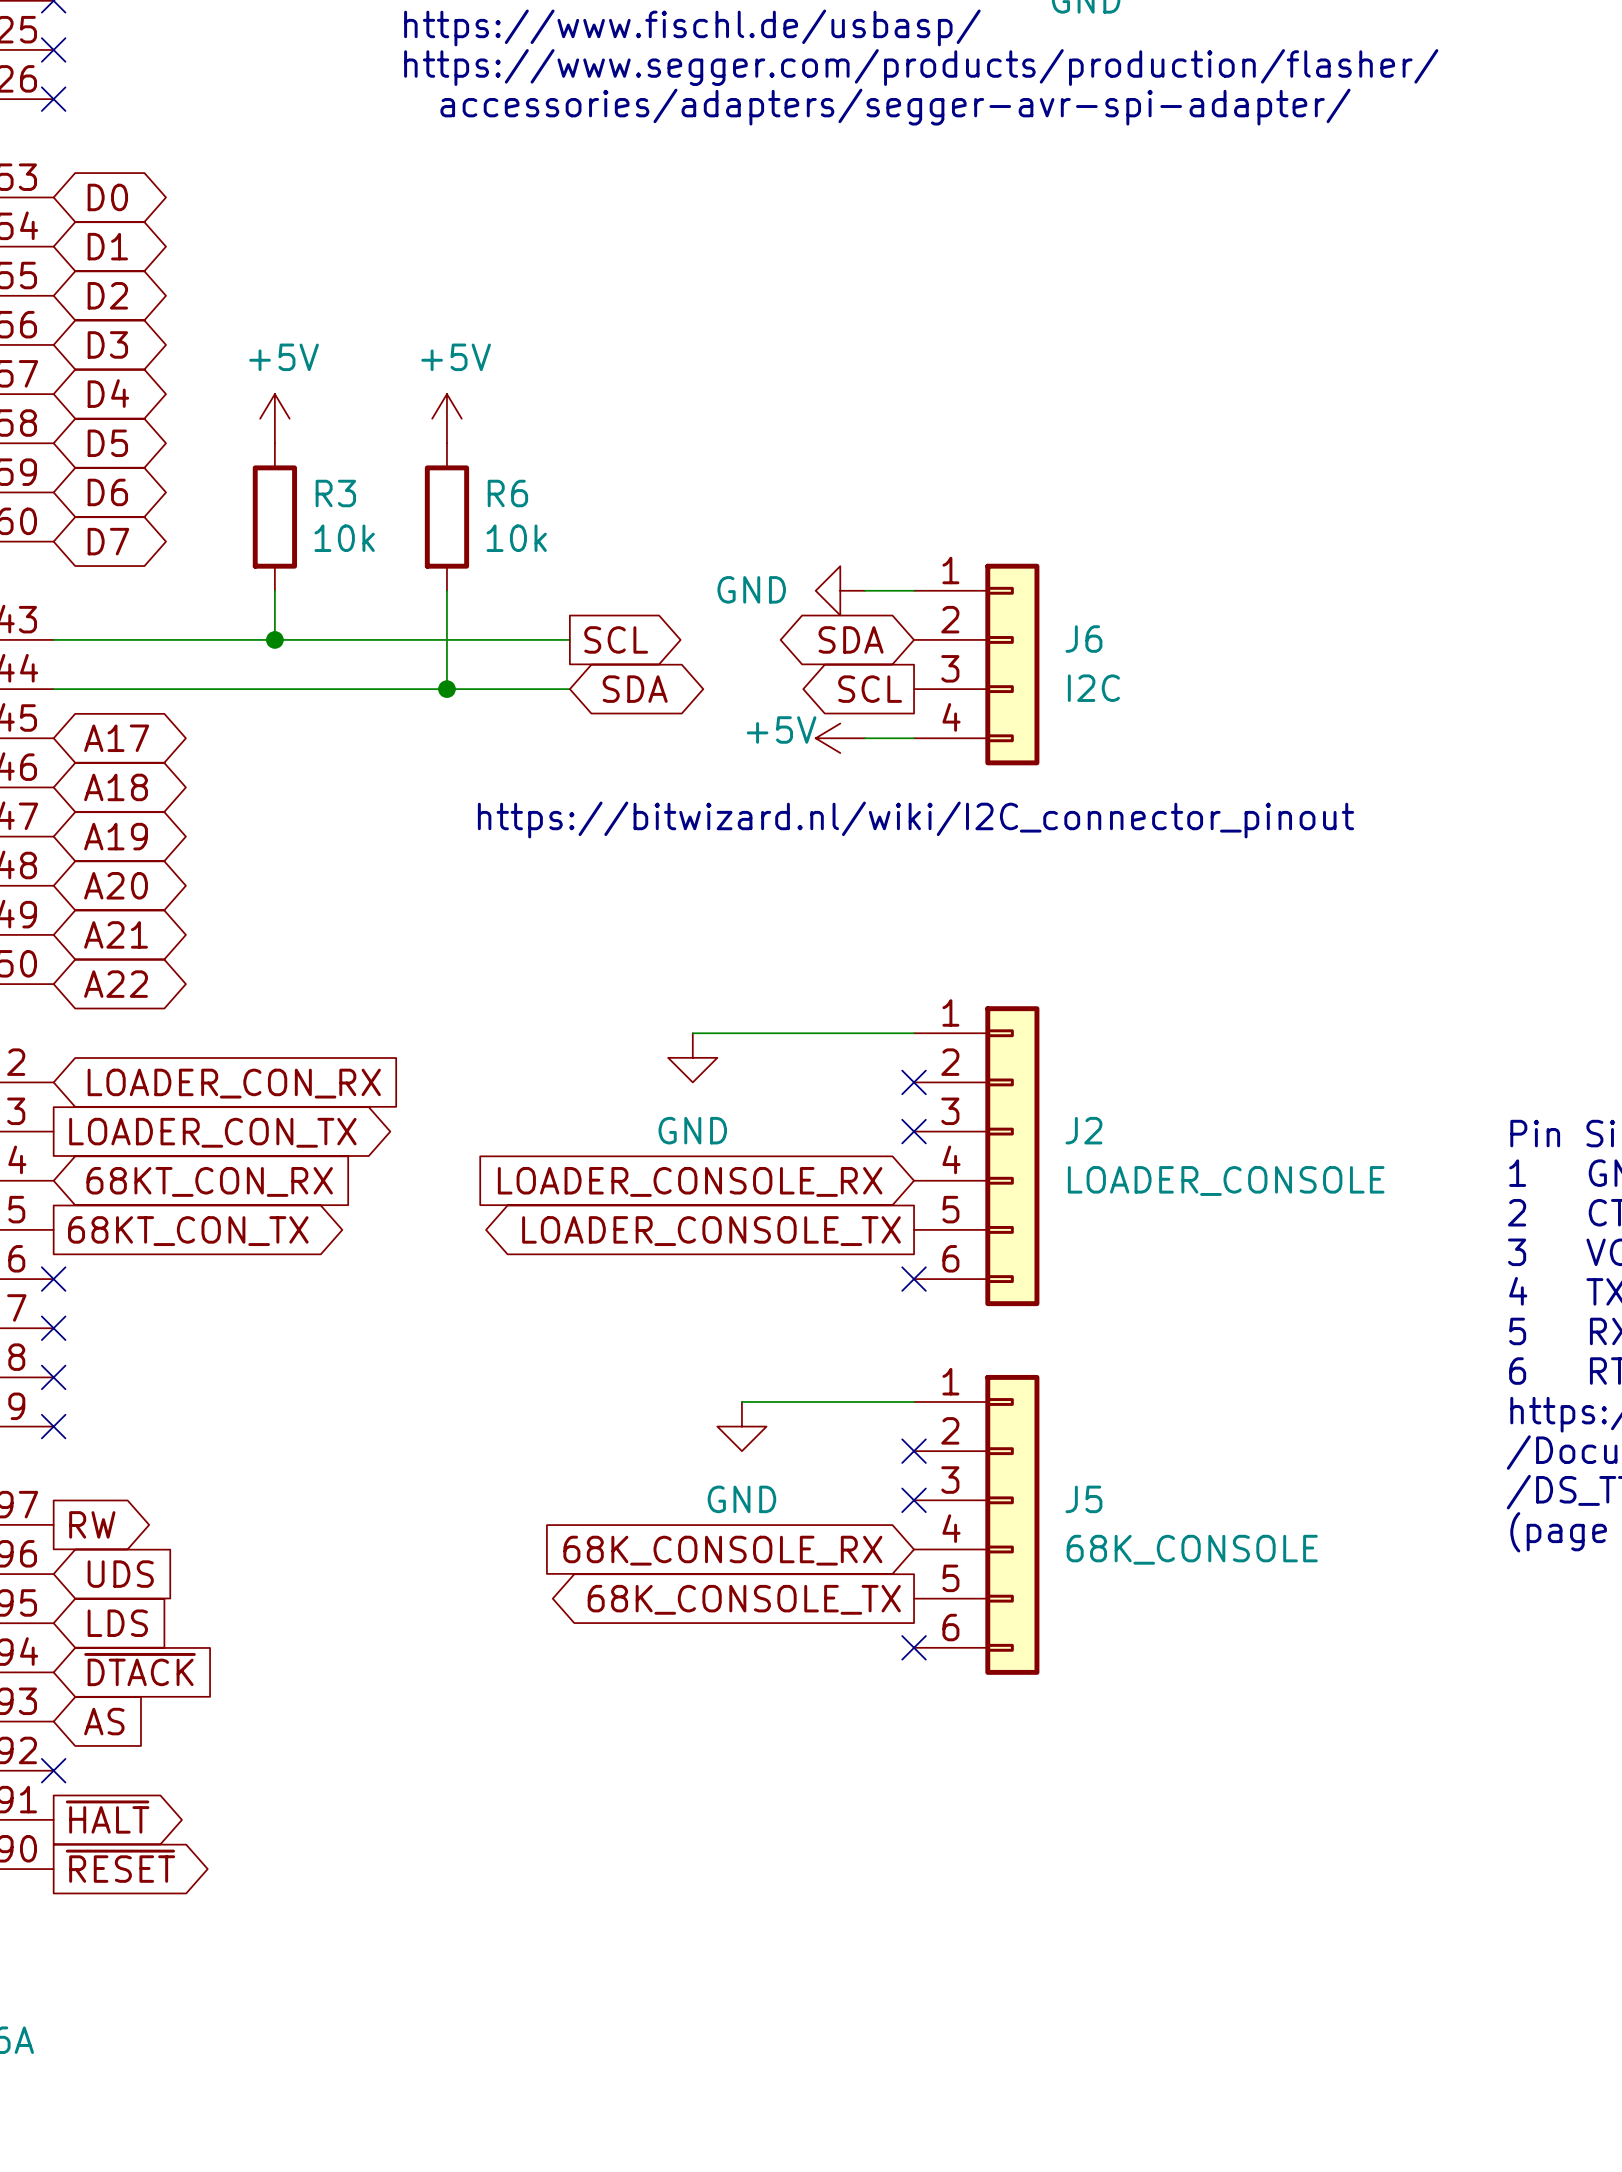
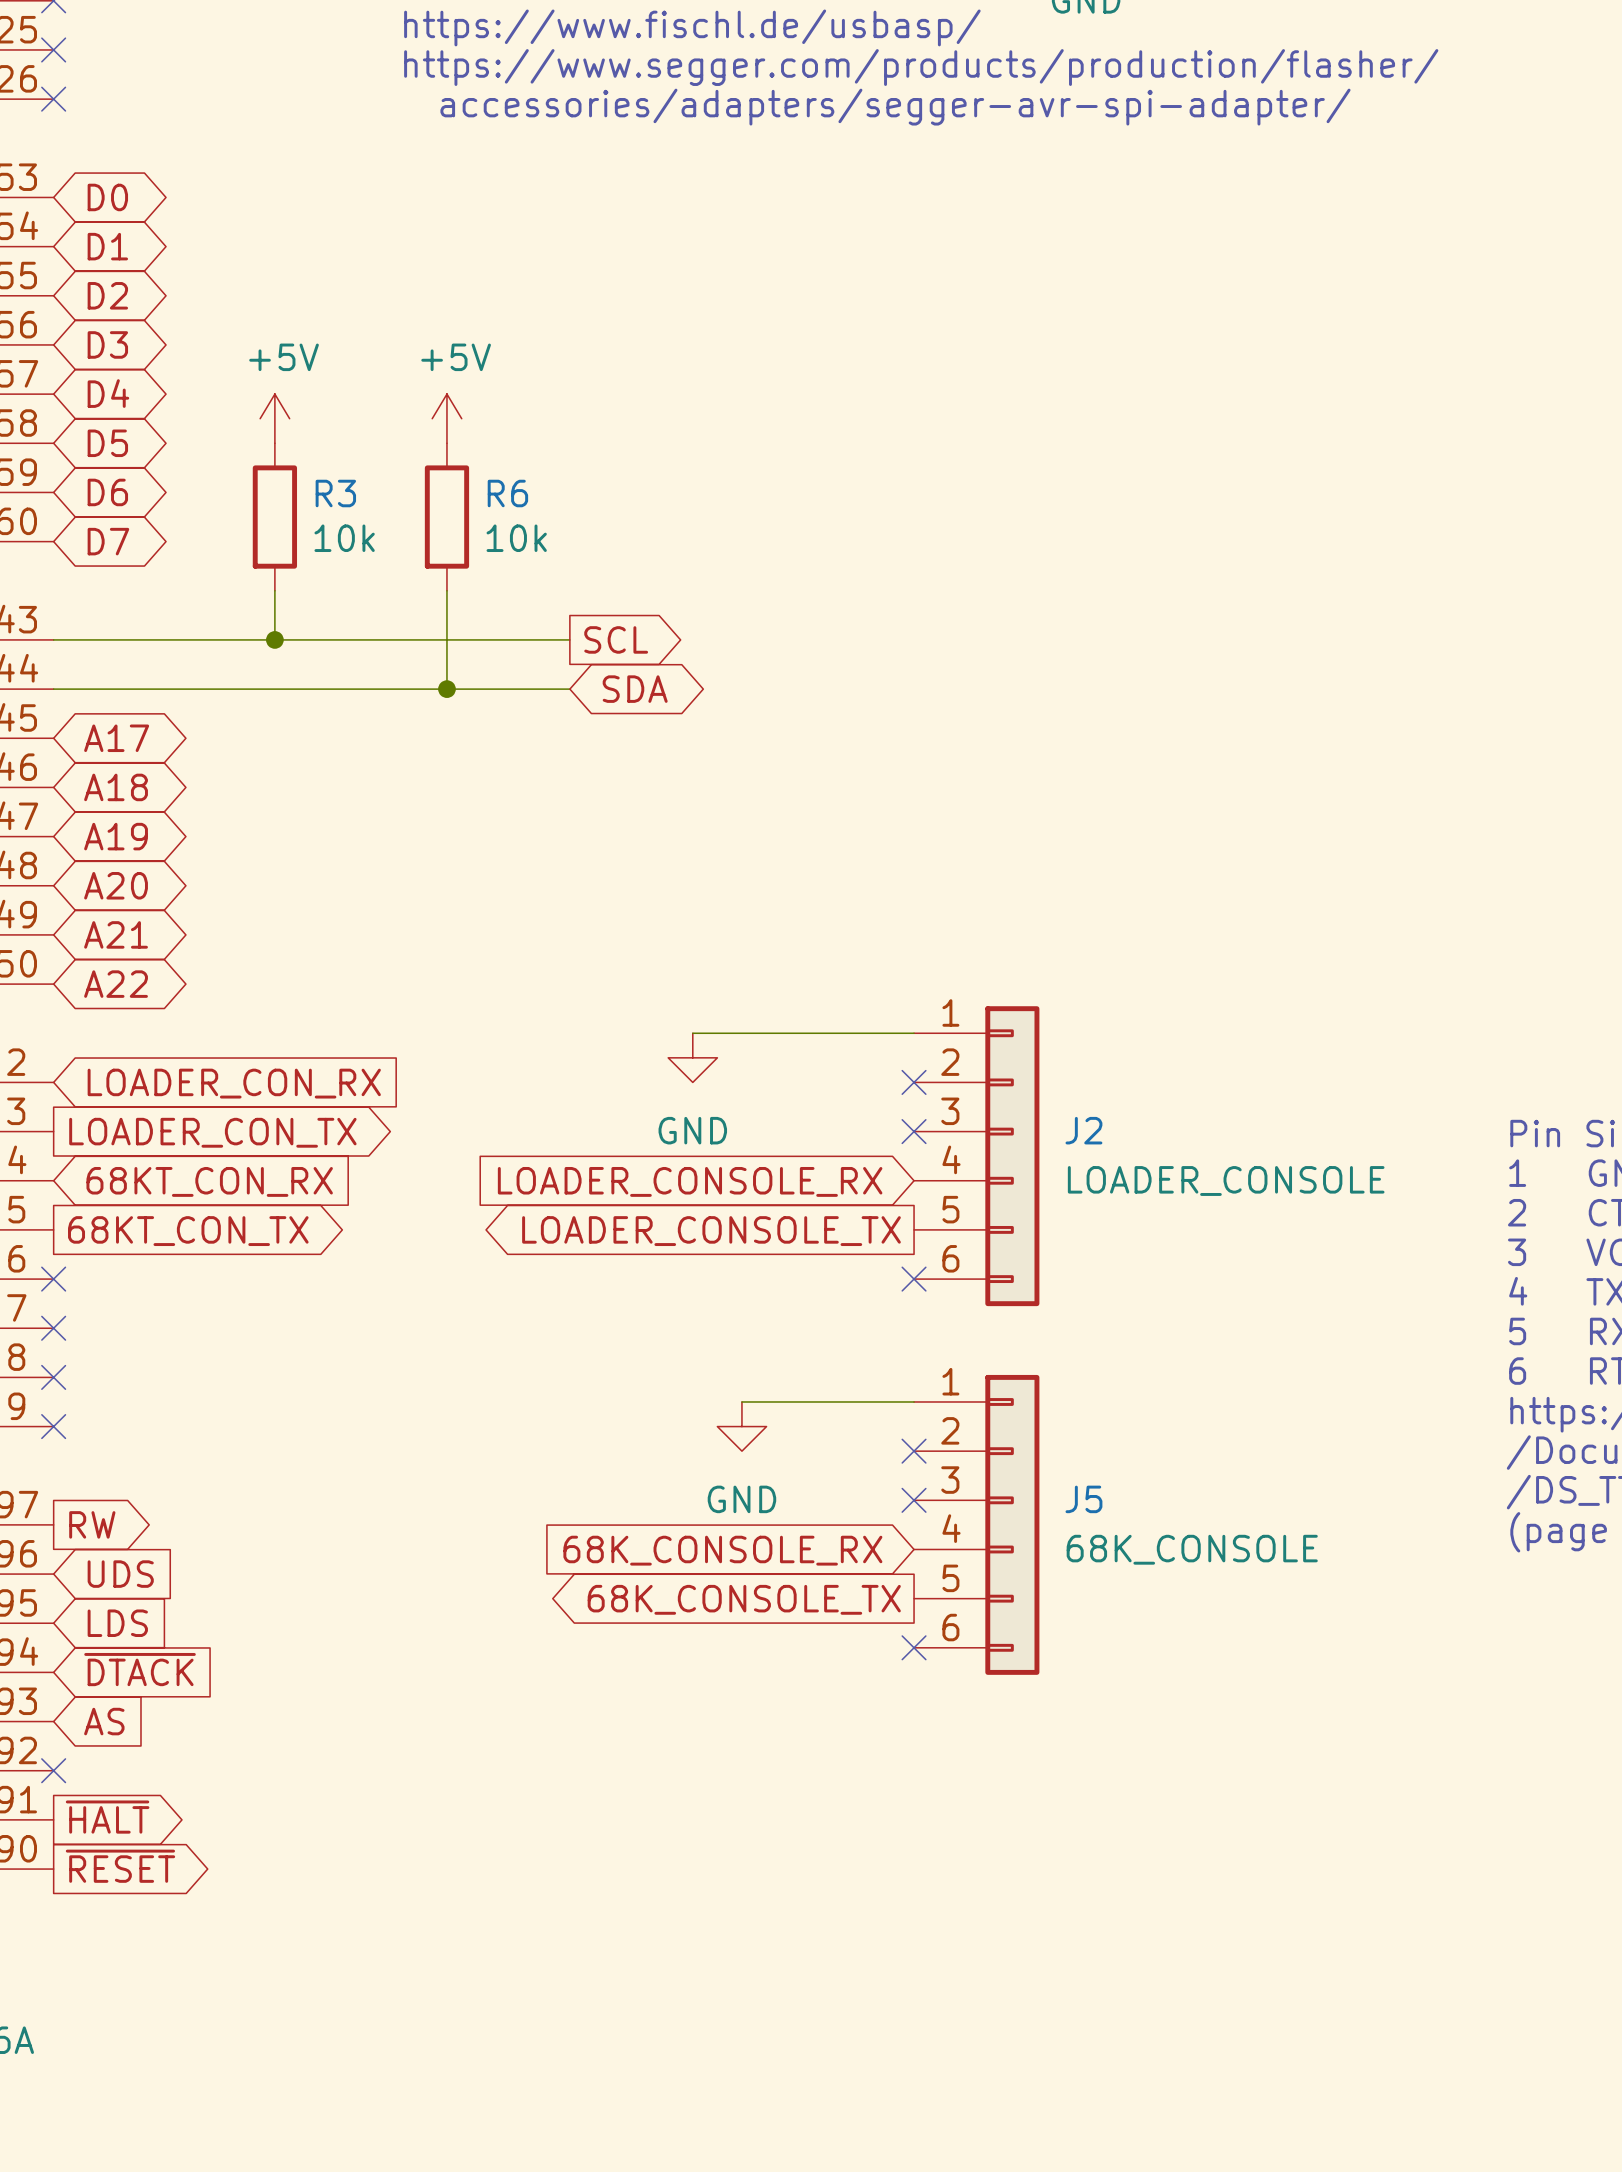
power symbol: GND (840, 590) -> none
wire: (864, 590) (914, 590) -> none
global label: SDA (851, 639) -> none
J6: I2C (976, 664) -> none
global label: SCL (870, 689) -> none
power symbol: +5V (840, 738) -> none
wire: (864, 738) (914, 738) -> none
text: https://bitwizard.nl/wiki/I2C_connector_pinout (915, 819) -> none

